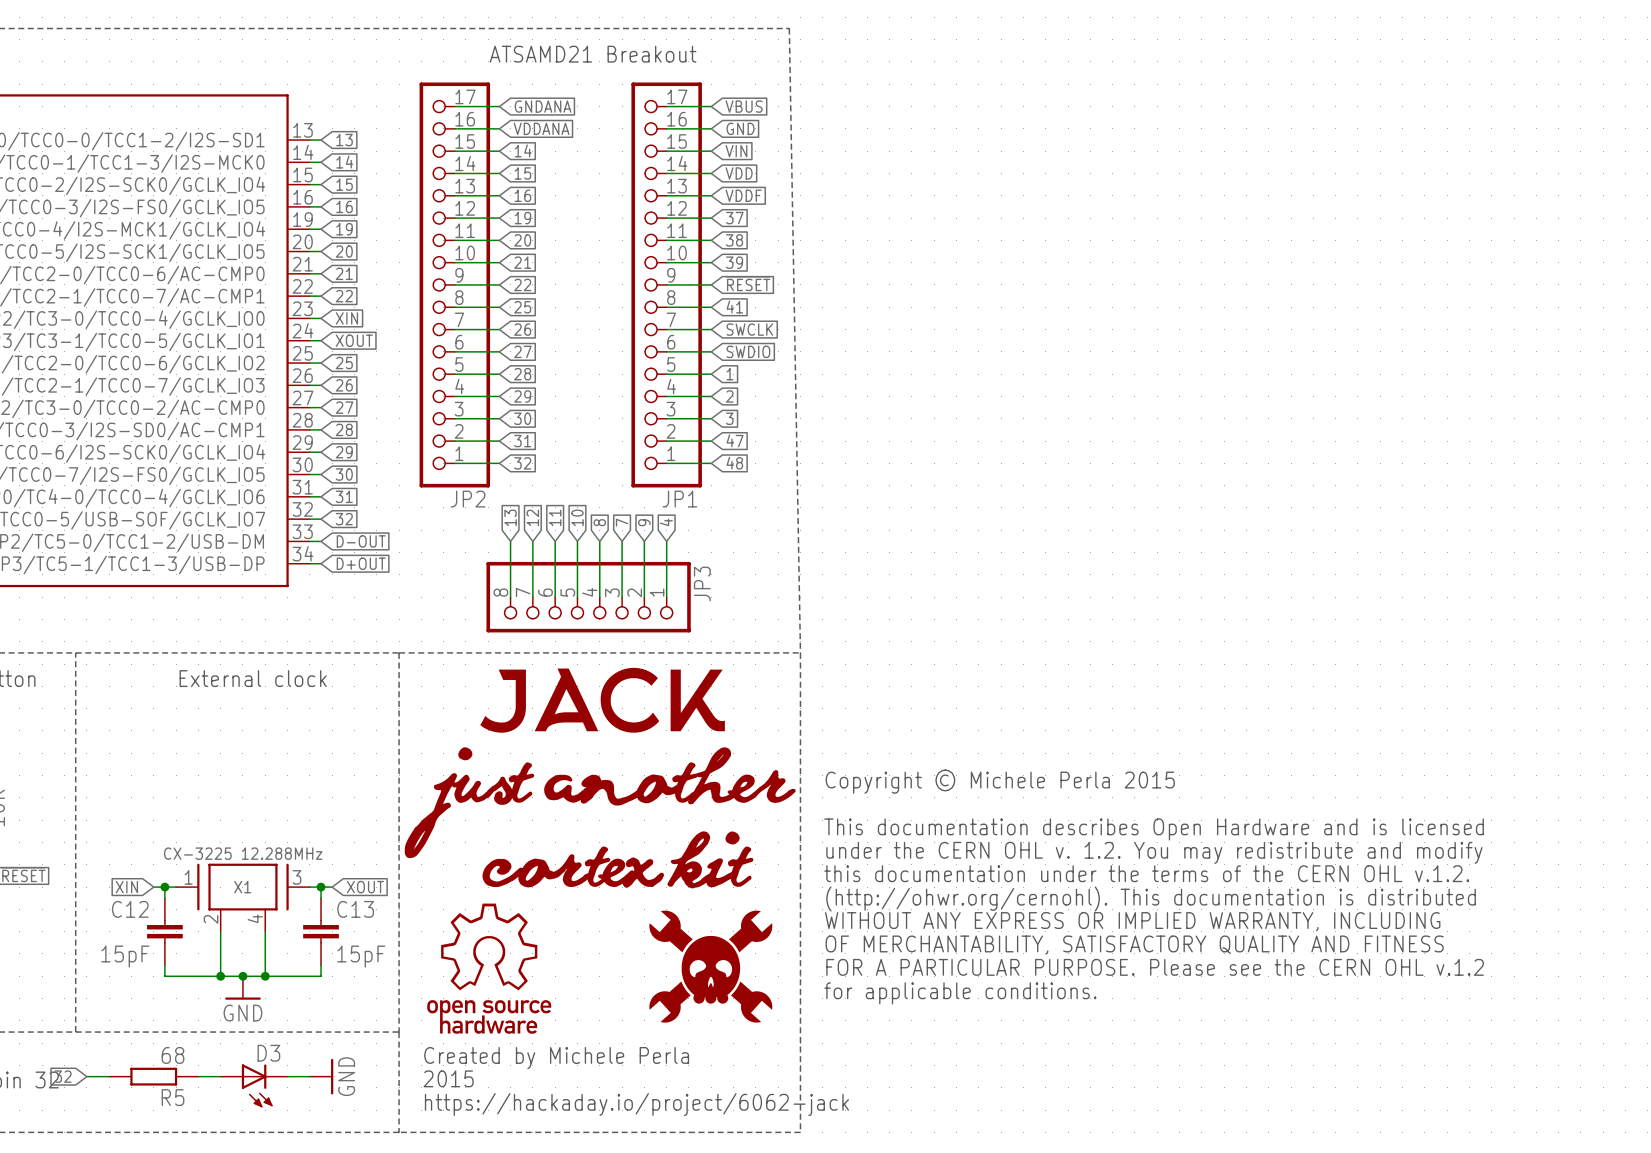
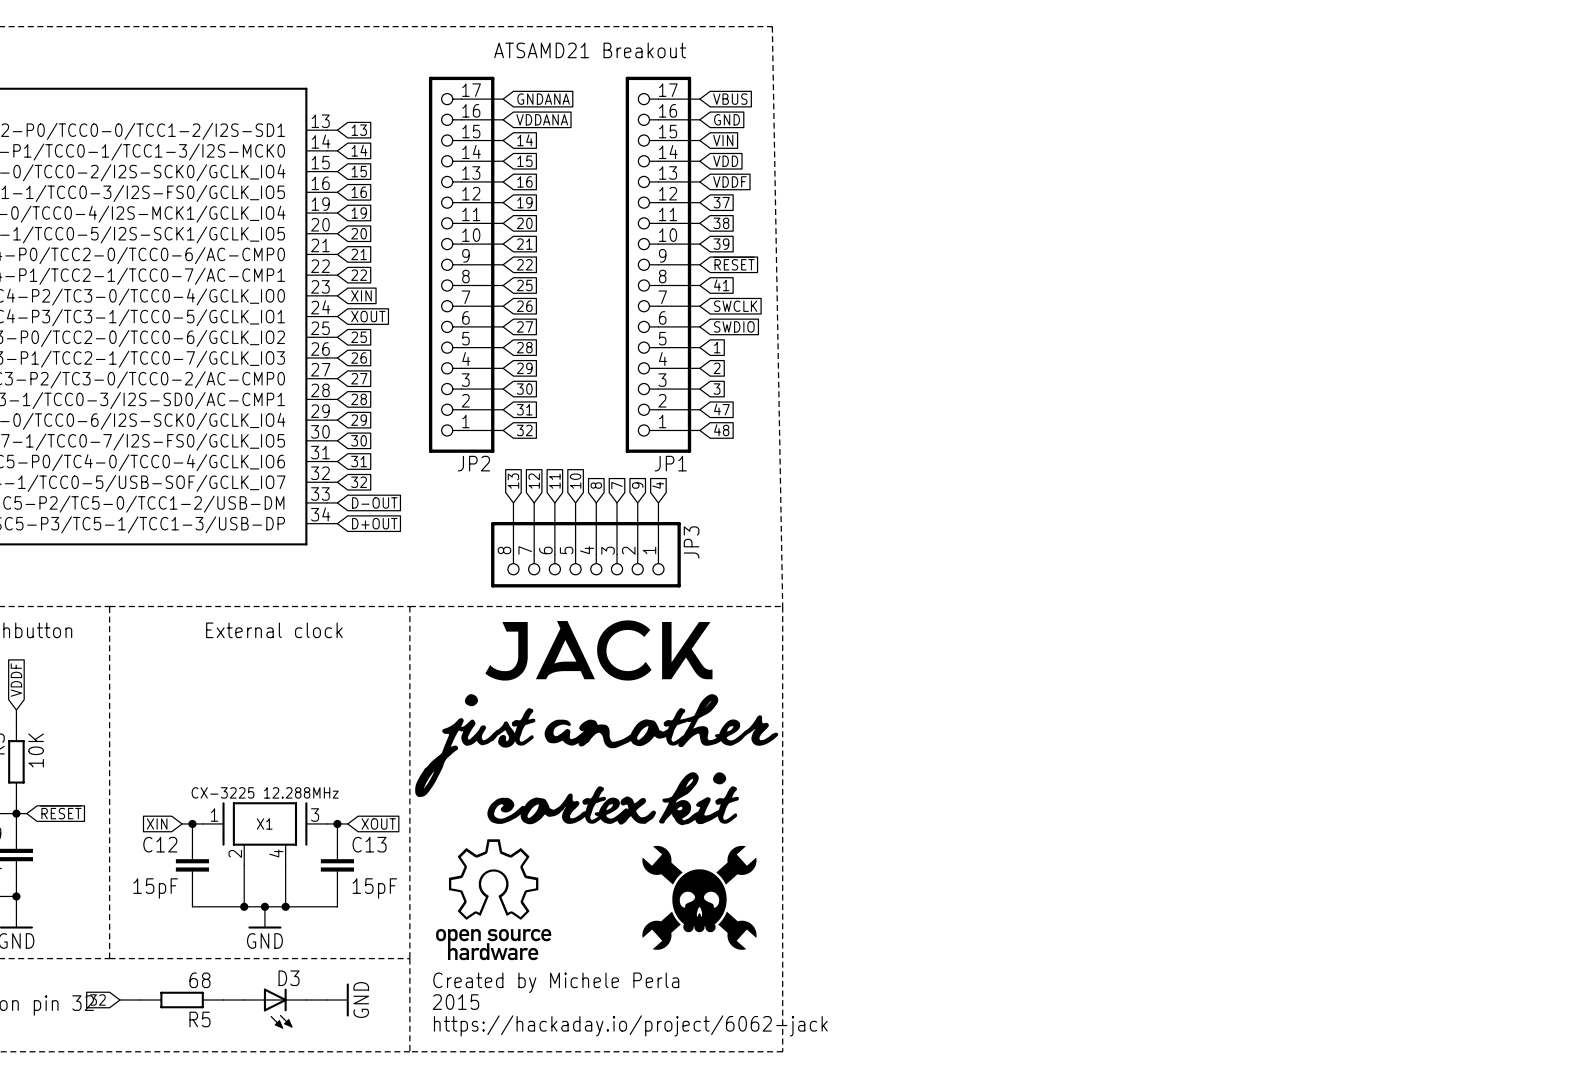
text: Copyright © Michele Perla 2015 (1000, 781) -> none
text: This documentation describes Open Hardware and is licensed (1154, 829) -> none
text: under the CERN OHL v. 1.2. You may redistribute and modify (1154, 852) -> none
text: this documentation under the terms of the CERN OHL v.1.2. (1146, 873) -> none
text: (http://ohwr.org/cernohl). This documentation is distributed (1151, 898) -> none
text: WITHOUT ANY EXPRESS OR IMPLIED WARRANTY, INCLUDING (1132, 921) -> none
text: OF MERCHANTABILITY, SATISFACTORY QUALITY AND FITNESS (1134, 945) -> none
text: FOR A PARTICULAR PURPOSE. Please see the CERN OHL v.1.2 (1155, 967) -> none
text: for applicable conditions. (960, 993) -> none

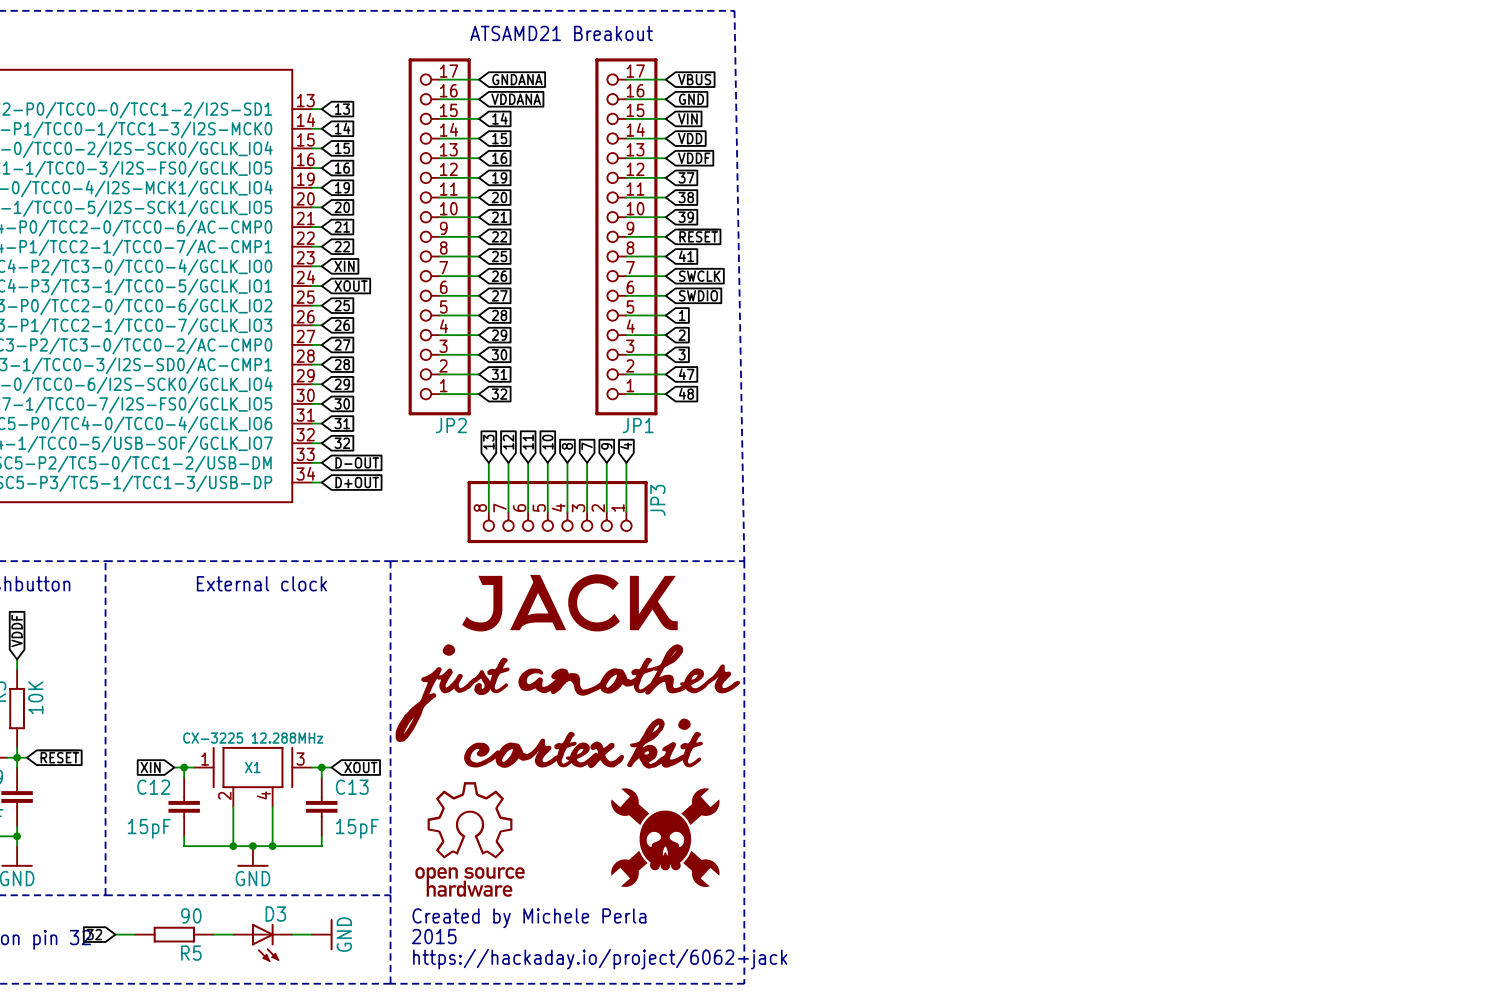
R5 value: 68 (199, 980) -> 90 (191, 915)

